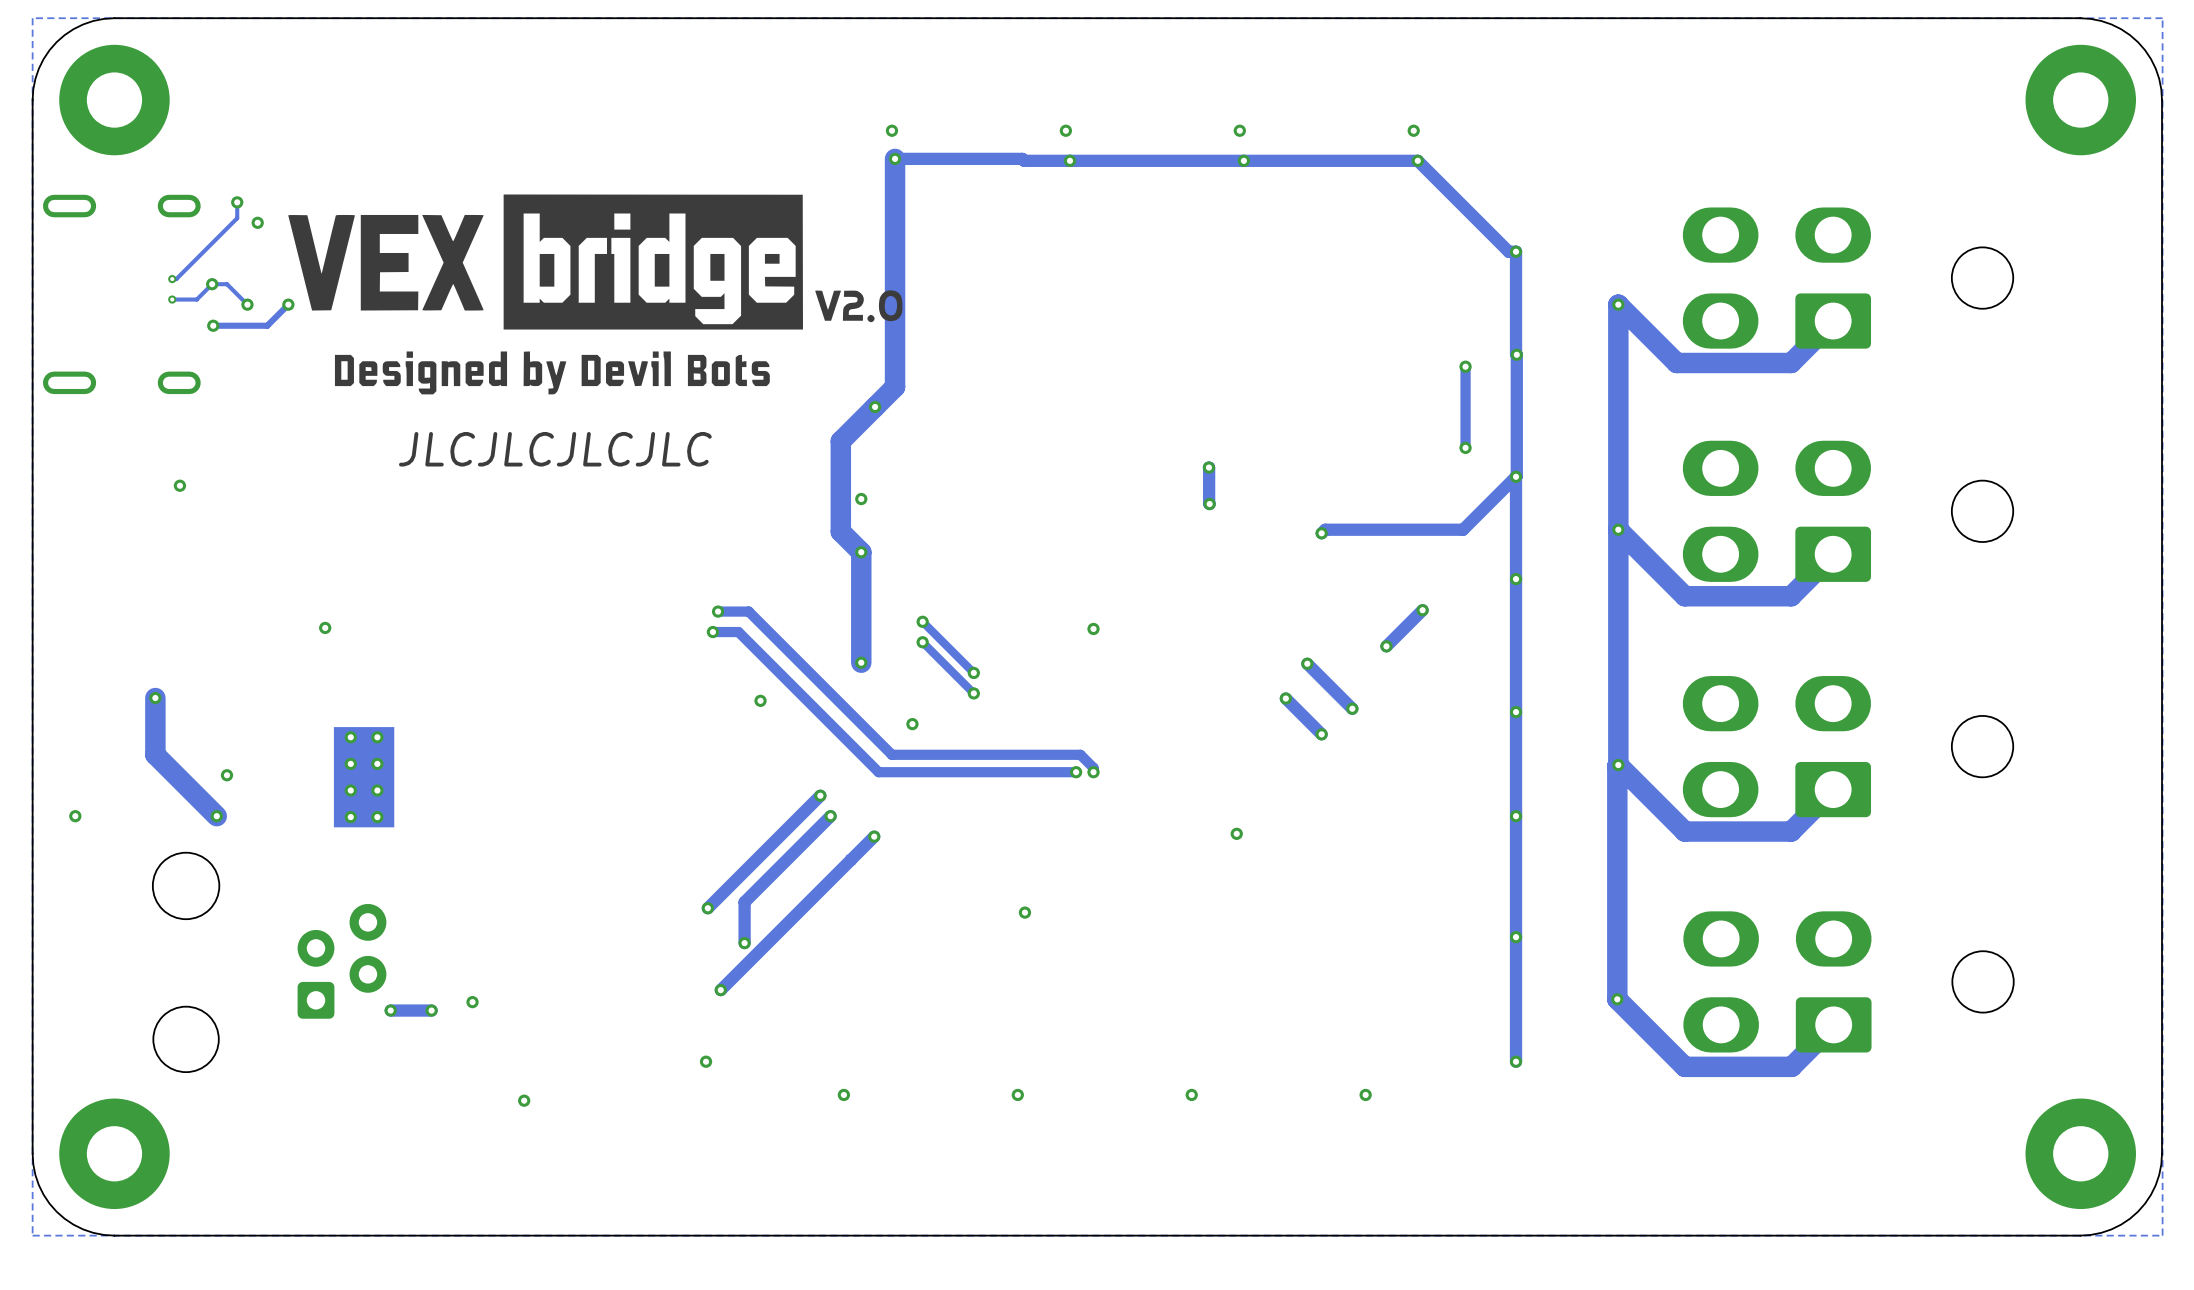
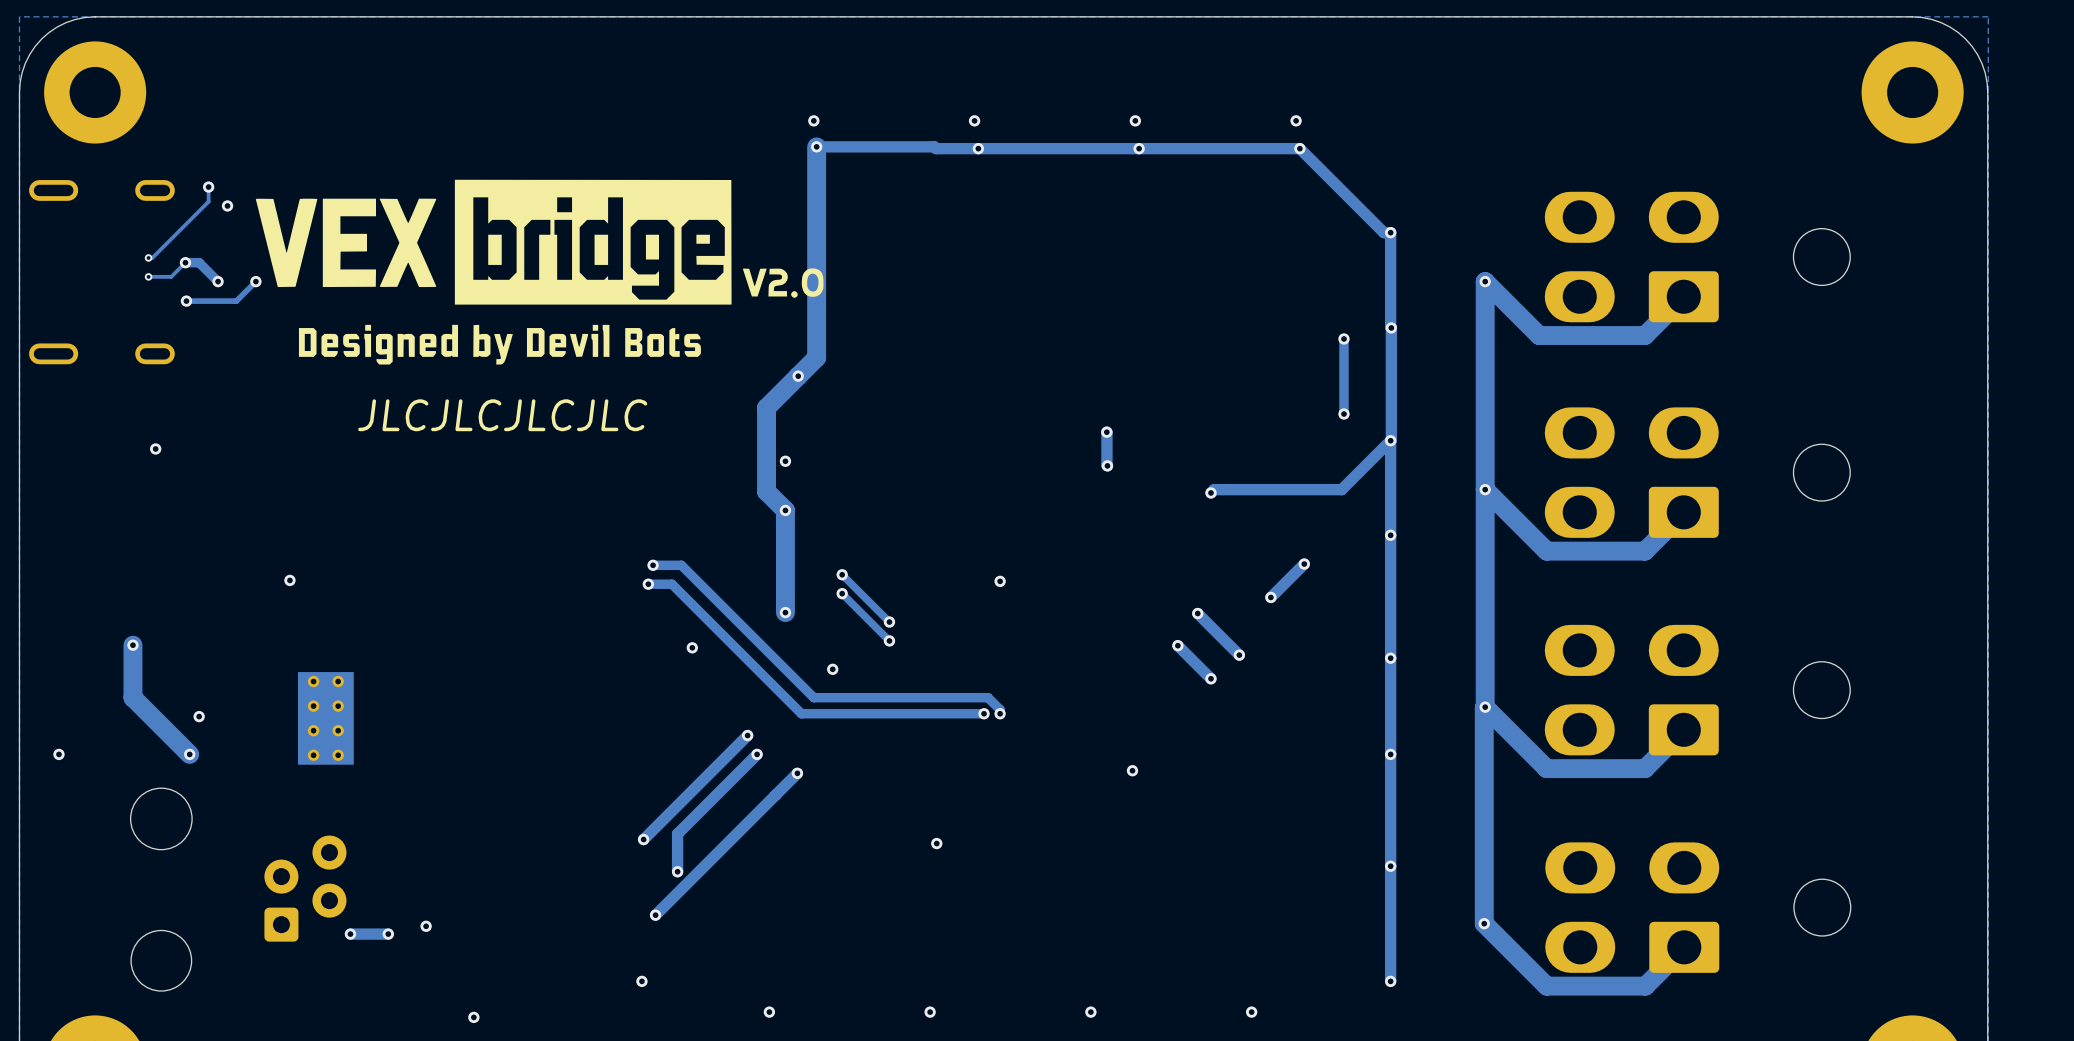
track width: thin (212, 284) (227, 284) (247, 304) -> thick (185, 262) (199, 262) (218, 281)

